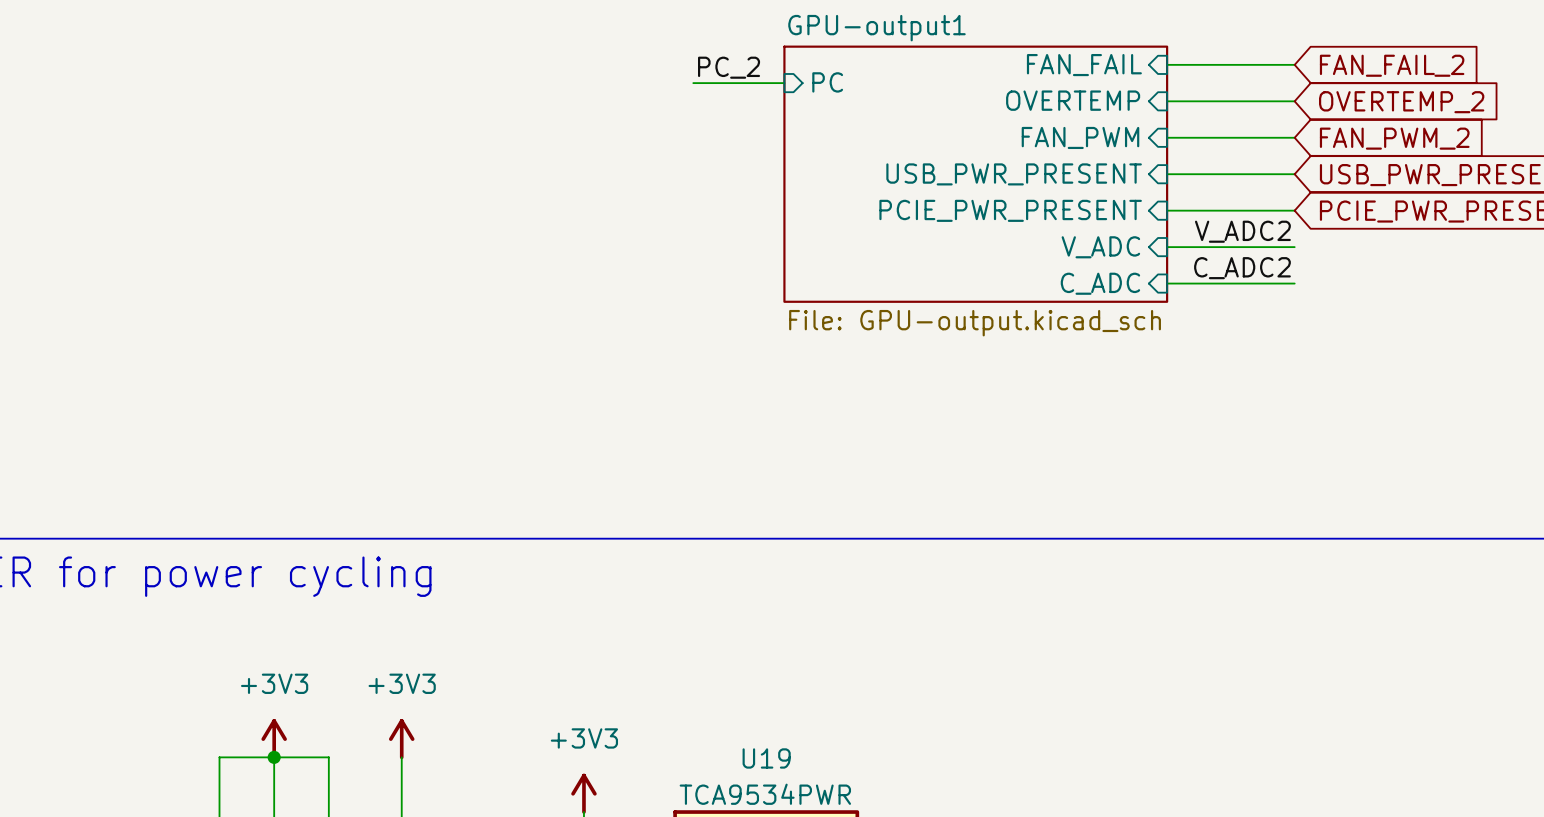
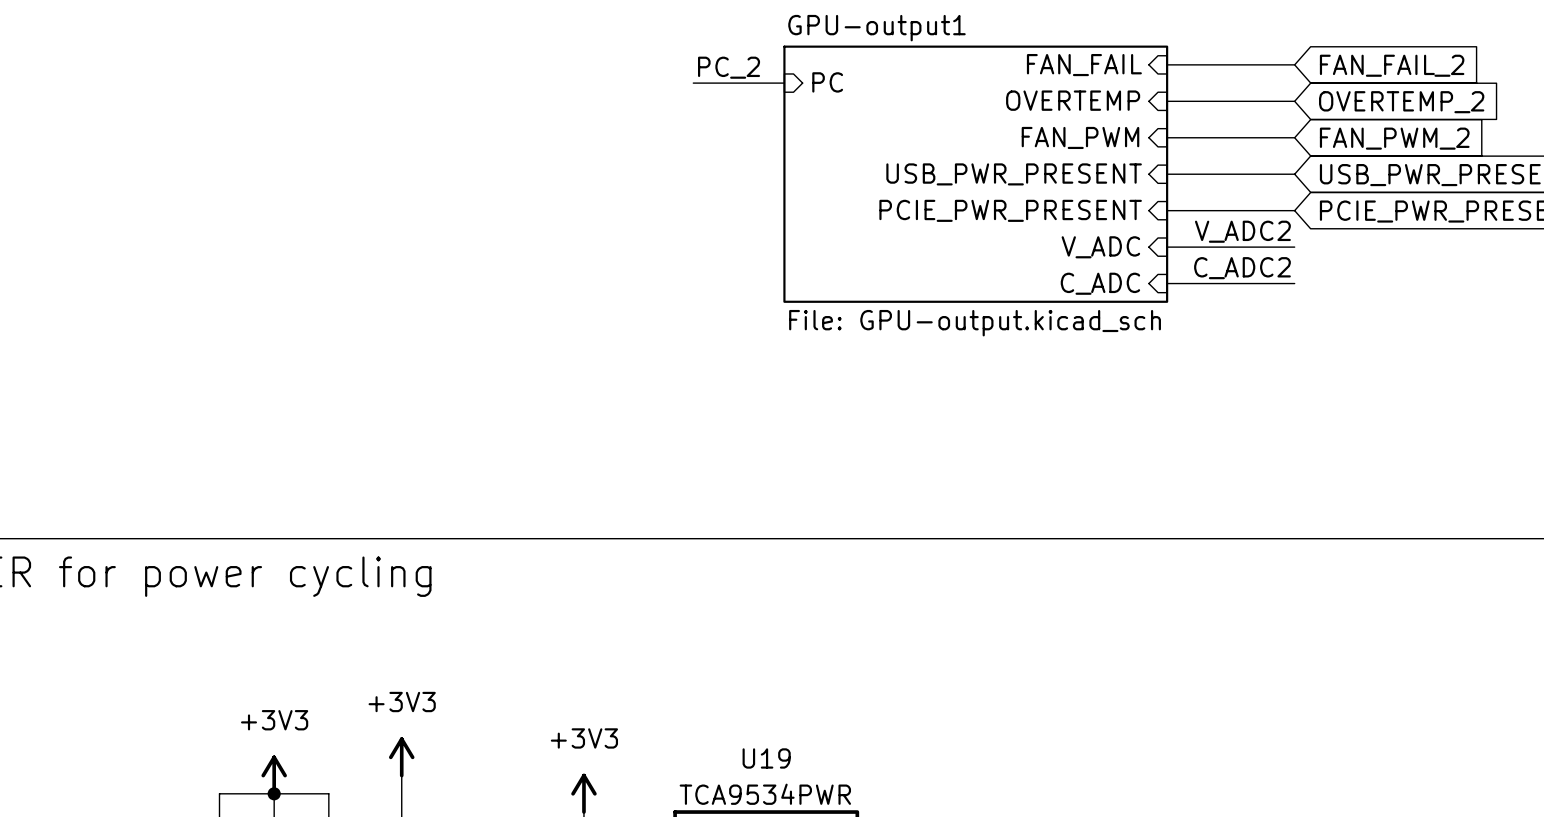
power symbol position: +3V3 (274, 739) -> +3V3 (274, 775)
power symbol position: +3V3 (401, 739) -> +3V3 (401, 757)
junction position: (274, 757) -> (274, 793)
wire: (219, 793) (219, 757) (328, 757) (328, 793) -> (219, 793) (328, 793)

